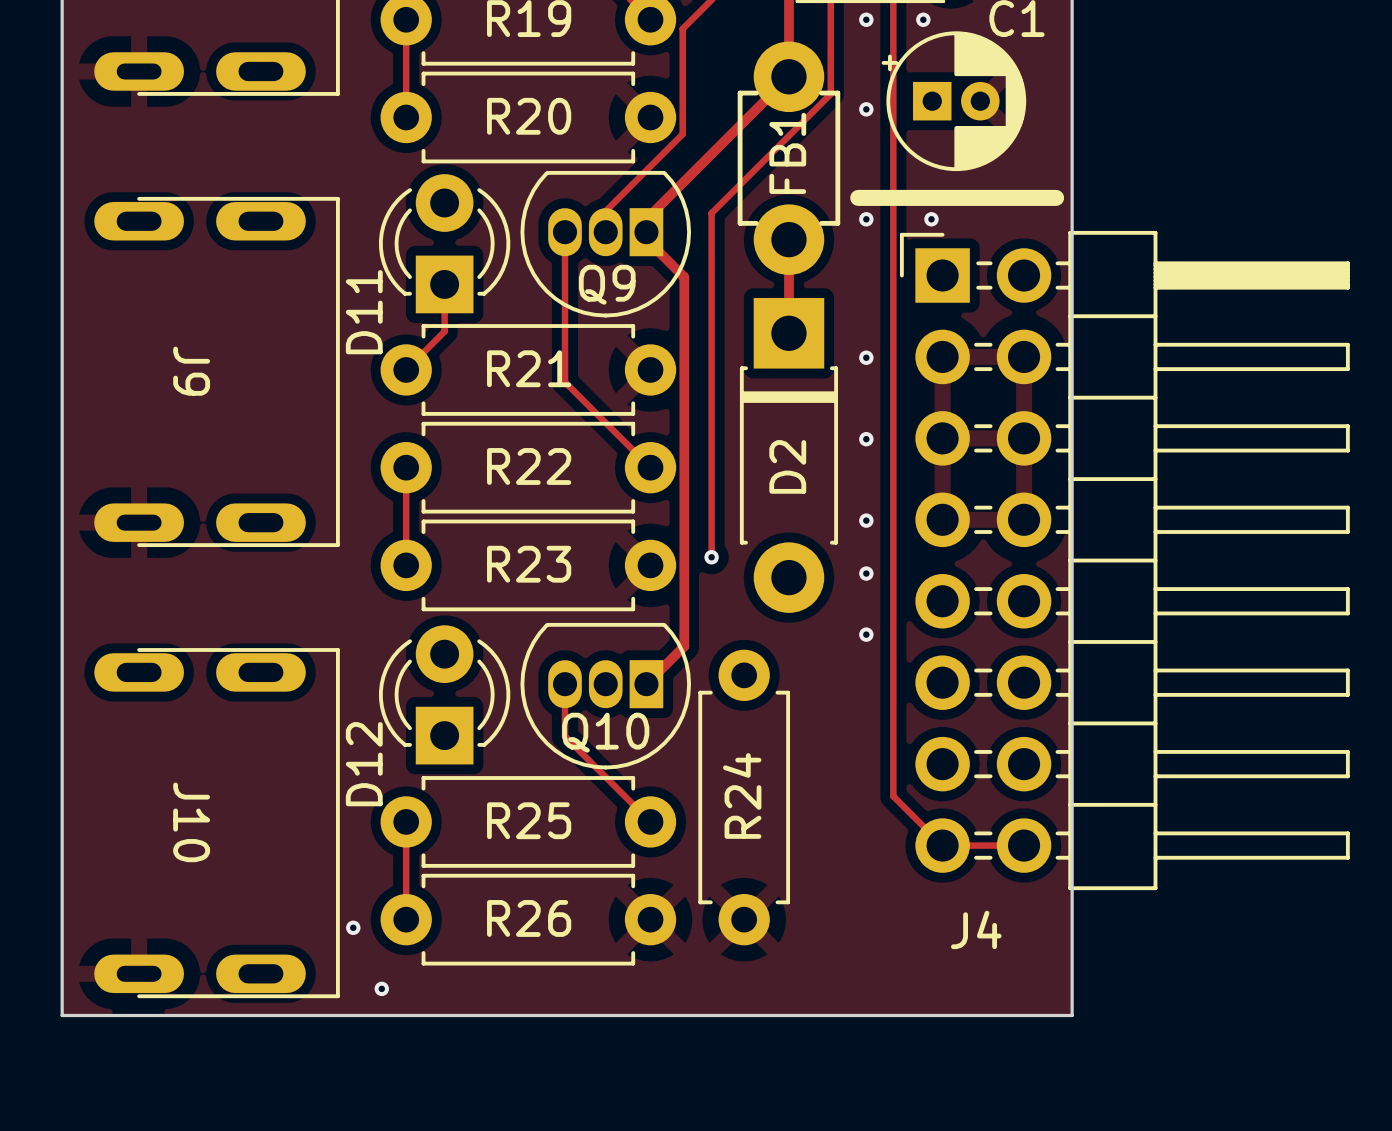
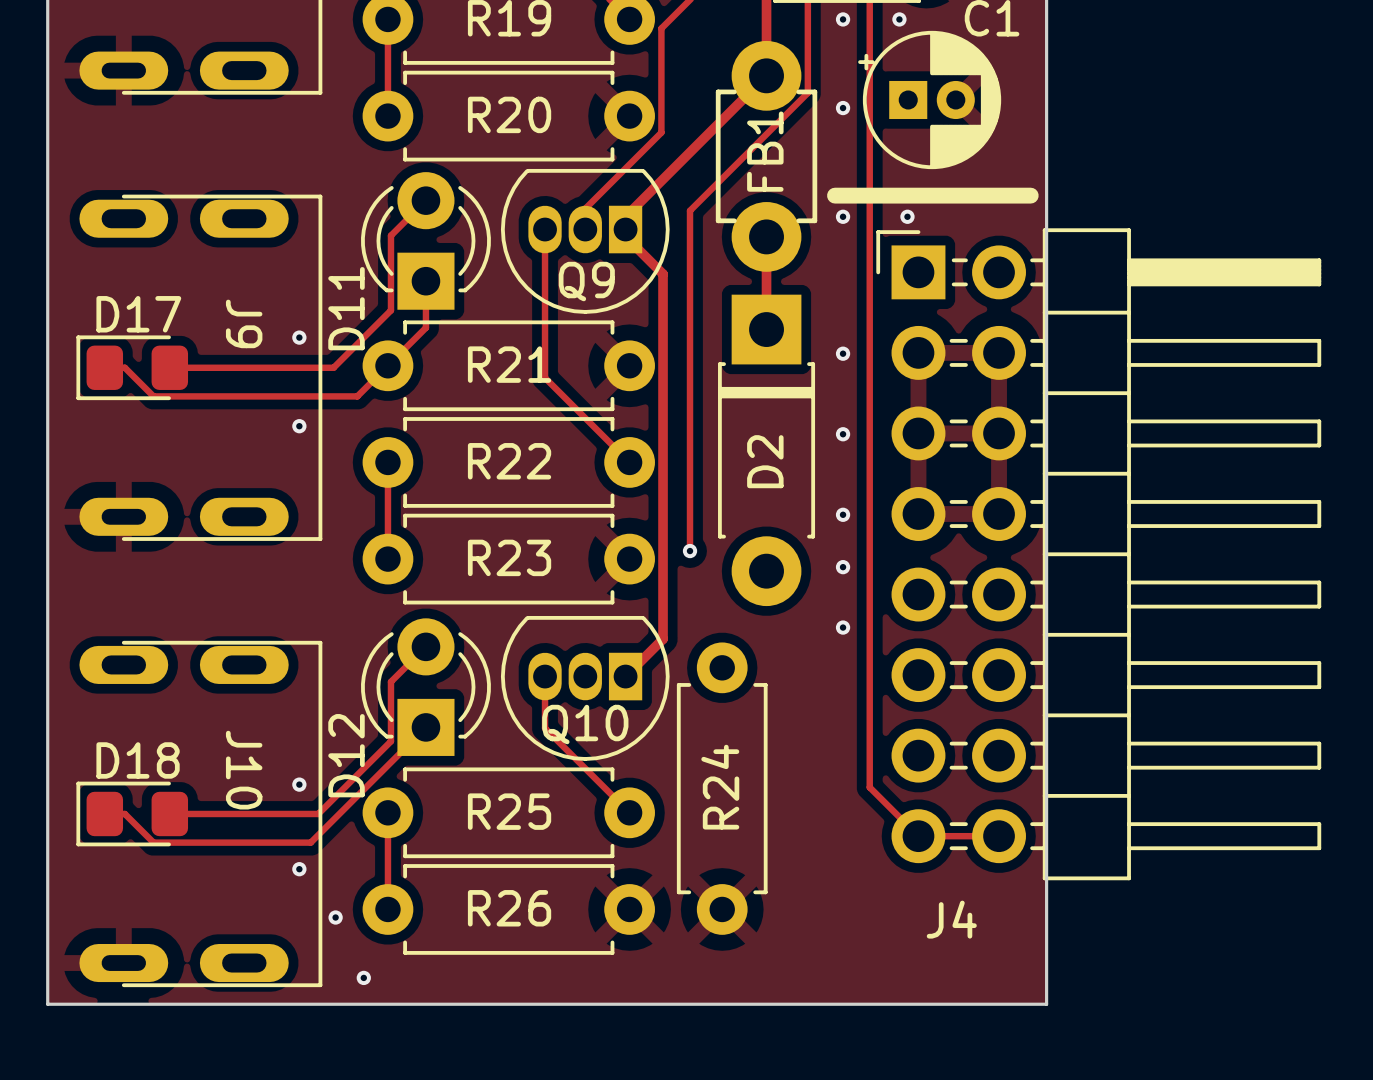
track: none -> (425, 200) (390, 235) (390, 310) (333, 367) (169, 367)
via: none -> (299, 337)
track: none -> (387, 365) (357, 396) (153, 396) (124, 367) (104, 367)
D17: none -> (132, 367)
J9 name position: J9 (191, 371) -> J9 (244, 323)
via: none -> (299, 426)
track: none -> (425, 646) (390, 681) (390, 741) (318, 813) (169, 813)
track: none -> (425, 727) (310, 842) (153, 842) (124, 813) (104, 813)
via: none -> (299, 784)
J10 name position: J10 (191, 822) -> J10 (244, 770)
D18: none -> (132, 813)
via: none -> (299, 869)

